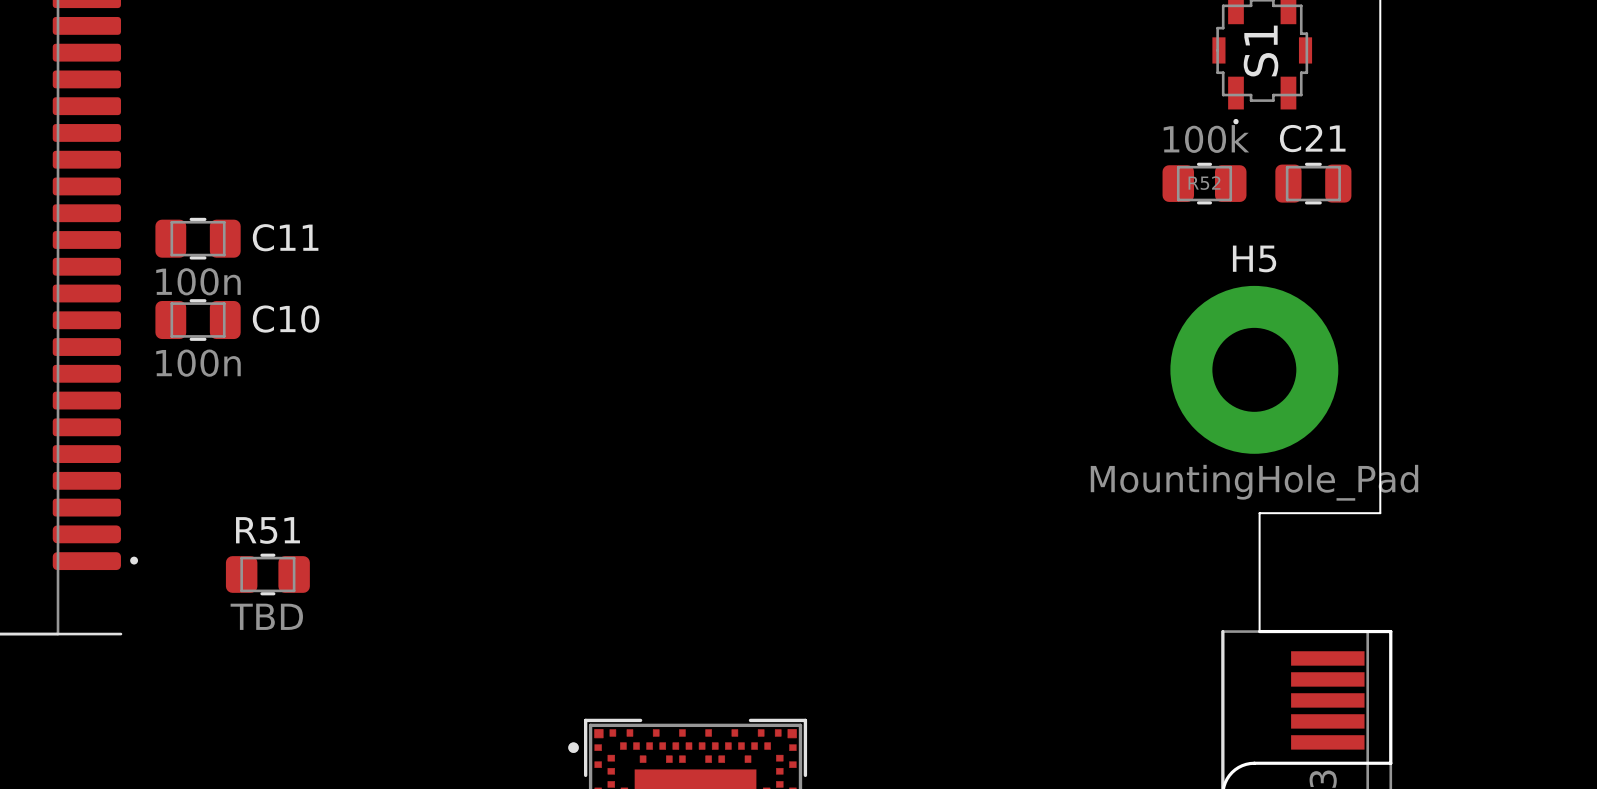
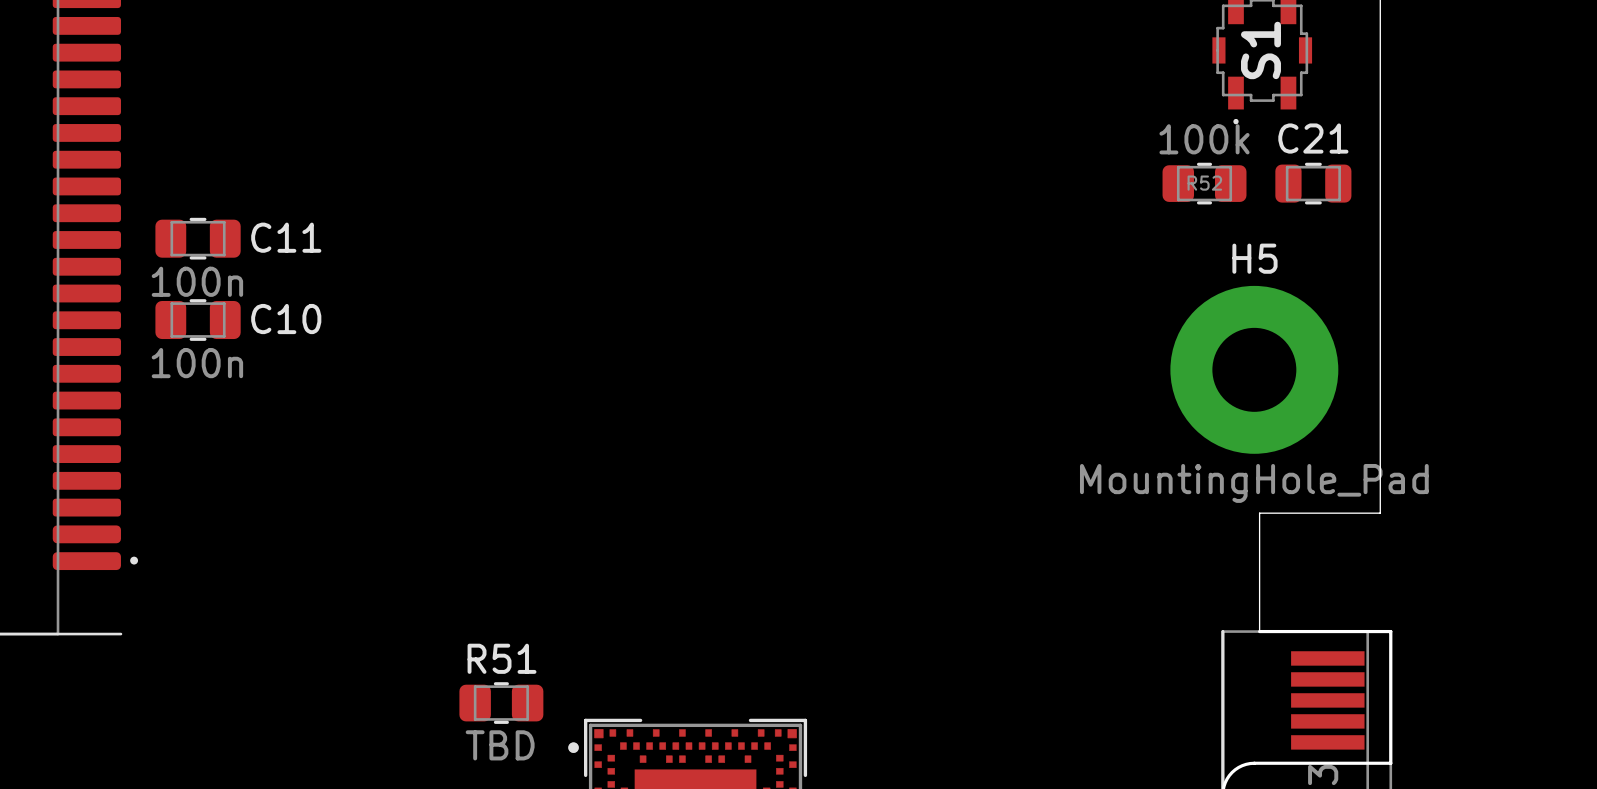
R51 position: (267, 574) -> (501, 703)

